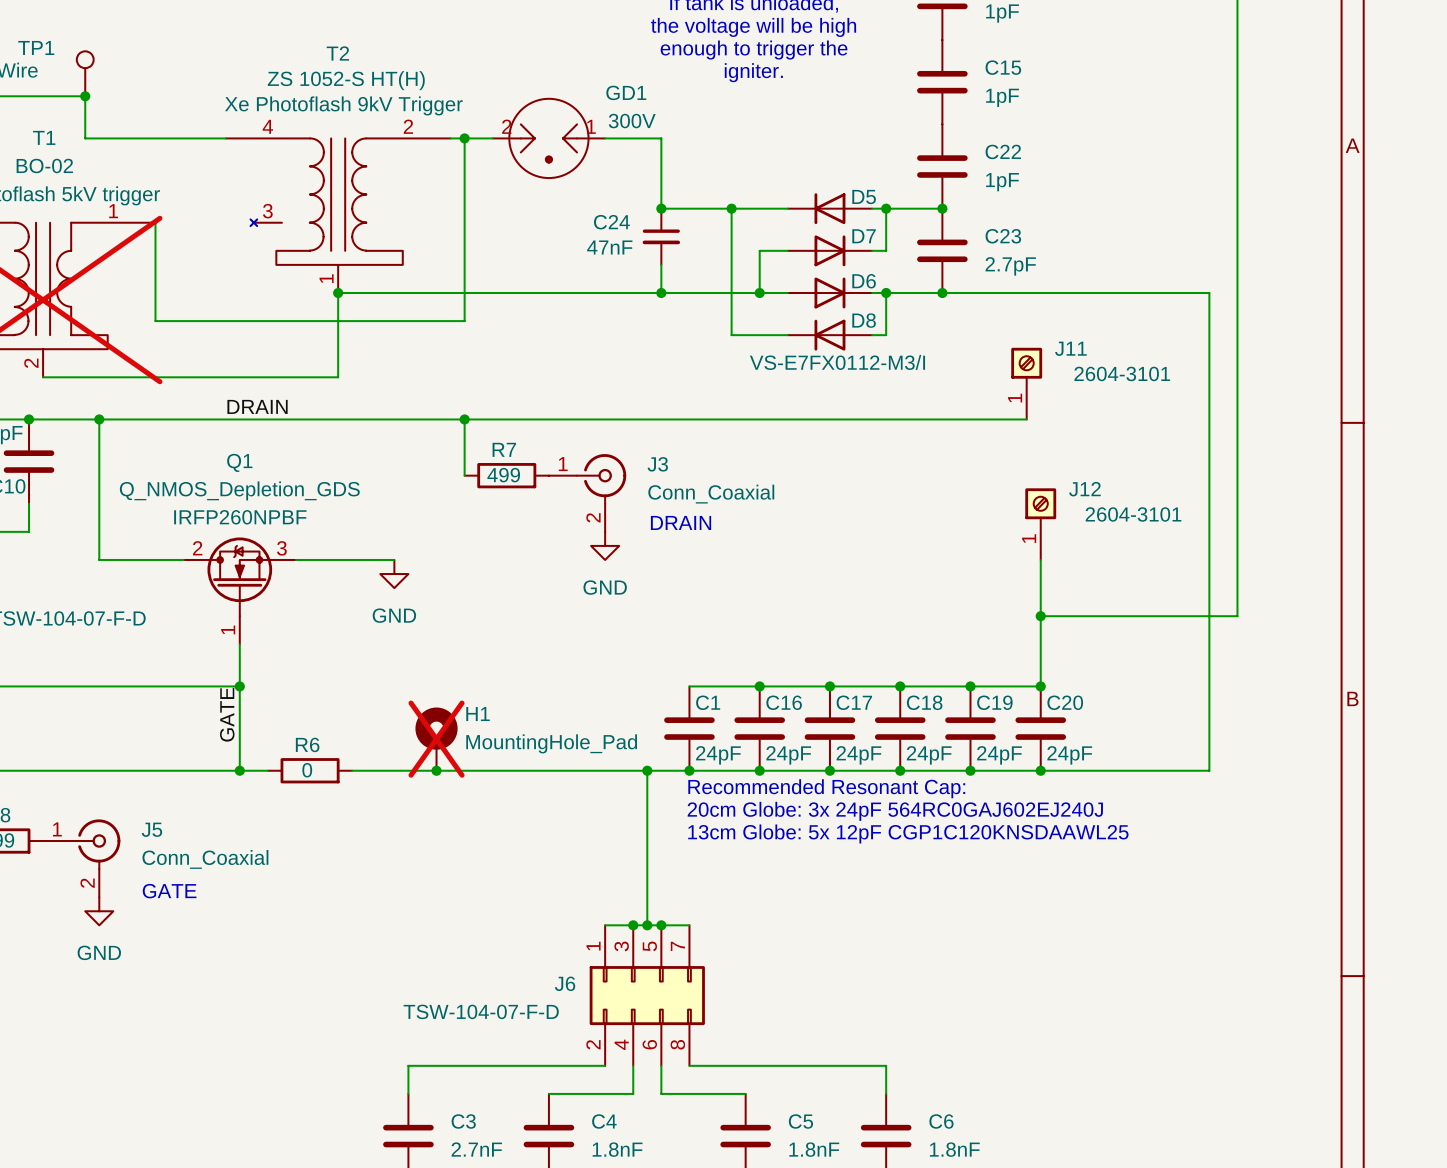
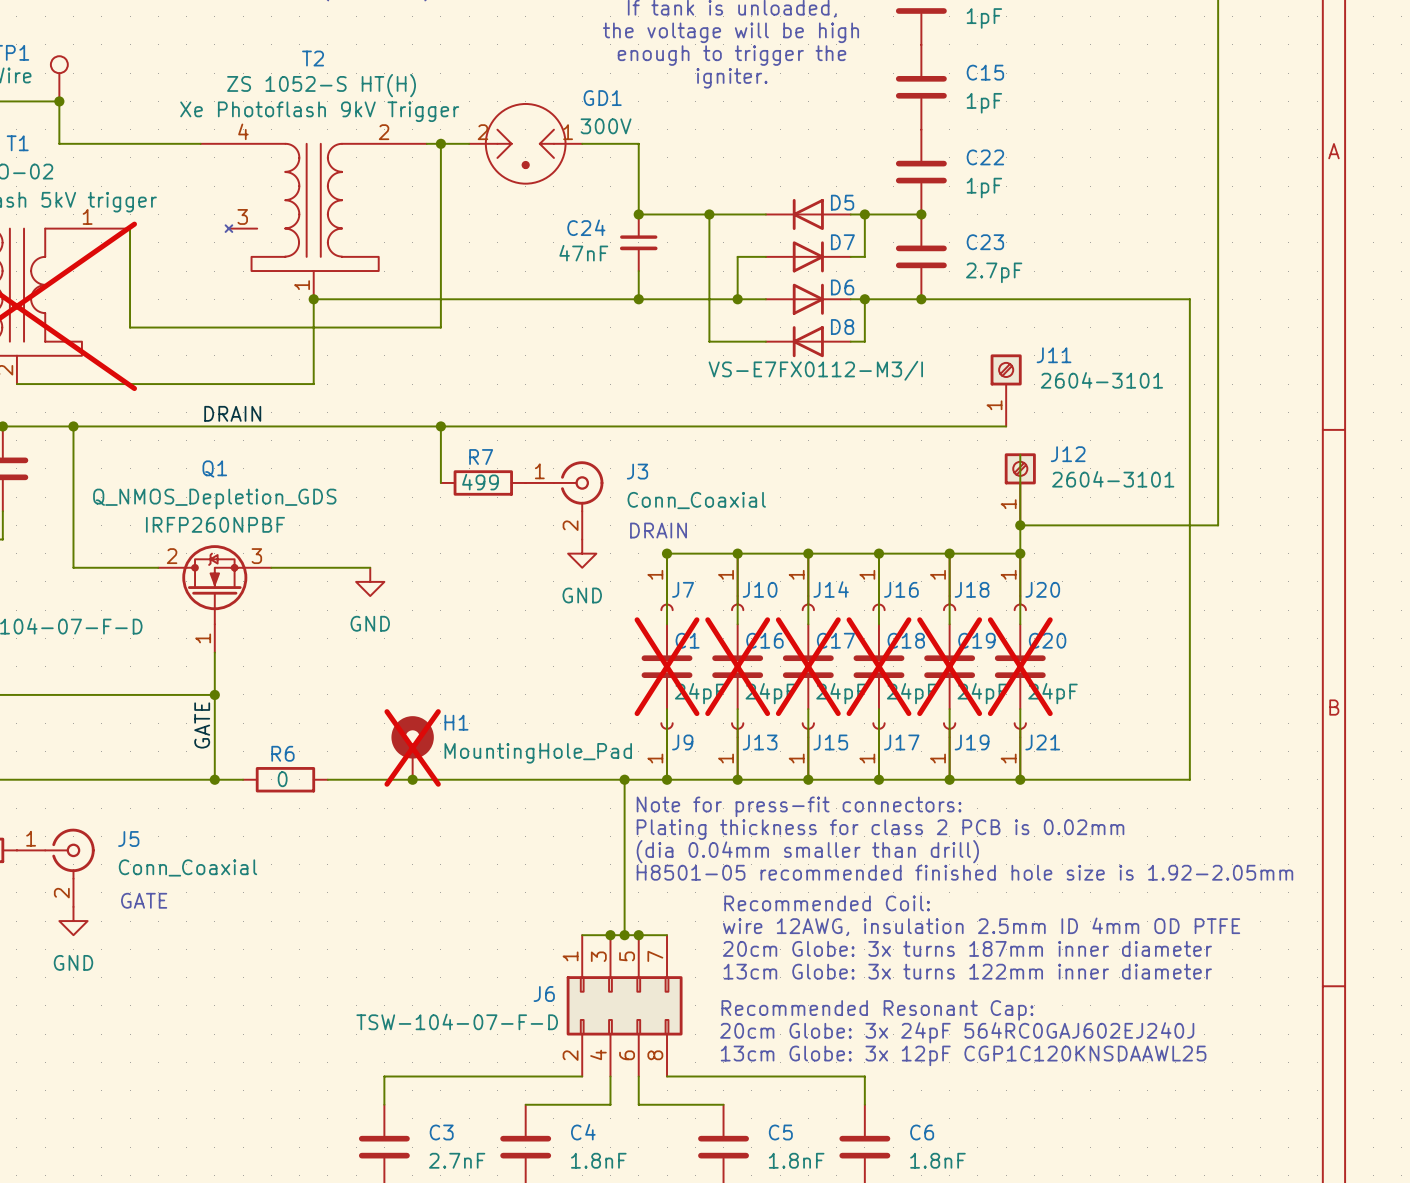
junction: none -> (1020, 525)
wire: (1237, 517) (1237, 616) (1040, 616) (1040, 686) (689, 686) -> (1218, 525) (1020, 525)
J12 position: (1040, 524) -> (1020, 489)
junction: none -> (667, 553)
wire: none -> (737, 553) (737, 624)
junction: none -> (737, 553)
wire: none -> (808, 553) (808, 624)
junction: none -> (808, 553)
wire: none -> (878, 553) (878, 624)
junction: none -> (878, 553)
wire: none -> (949, 553) (949, 624)
junction: none -> (949, 553)
wire: none -> (1020, 553) (667, 553) (667, 624)
junction: none -> (1020, 553)
J7: none -> (667, 582)
J10: none -> (737, 582)
J14: none -> (808, 582)
J16: none -> (878, 582)
J18: none -> (949, 582)
J20: none -> (1020, 582)
junction: (1040, 616) -> none
C1 do-not-place cross: none -> (667, 666)
C16 do-not-place cross: none -> (737, 666)
C17 do-not-place cross: none -> (808, 666)
C18 do-not-place cross: none -> (878, 666)
C19 do-not-place cross: none -> (949, 666)
C20 do-not-place cross: none -> (1020, 666)
junction: (759, 686) -> none
junction: (829, 686) -> none
junction: (900, 686) -> none
junction: (970, 686) -> none
junction: (1040, 686) -> none
C1 position: (689, 728) -> (667, 666)
C16 position: (759, 728) -> (737, 666)
C17 position: (829, 728) -> (808, 666)
C18 position: (900, 728) -> (878, 666)
C19 position: (970, 728) -> (949, 666)
C20 position: (1040, 728) -> (1020, 666)
J9: none -> (667, 751)
J13: none -> (737, 751)
J15: none -> (808, 751)
J17: none -> (878, 751)
J19: none -> (949, 751)
J21: none -> (1020, 751)
text position: Recommended Resonant Cap: (826, 788) -> Recommended Resonant Cap: (877, 1010)
text: none -> Note for press-fit connectors: (799, 806)
text position: 20cm Globe: 3x 24pF 564RC0GAJ602EJ240J (895, 811) -> 20cm Globe: 3x 24pF 564RC0GAJ602EJ240J (957, 1032)
text: none -> Plating thickness for class 2 PCB is 0.02mm (880, 829)
text: 13cm Globe: 5x 12pF CGP1C120KNSDAAWL25 (908, 833) -> none
text: none -> (dia 0.04mm smaller than drill) (807, 851)
text: none -> H8501-05 recommended finished hole size is 1.92-2.05mm (964, 872)
text: none -> Recommended Coil: (827, 903)
text: none -> wire 12AWG, insulation 2.5mm ID 4mm OD PTFE (981, 926)
text: none -> 20cm Globe: 3x turns 187mm inner diameter (967, 948)
text: none -> 13cm Globe: 3x turns 122mm inner diameter (967, 971)
text: none -> 13cm Globe: 3x 12pF CGP1C120KNSDAAWL25 (963, 1055)

